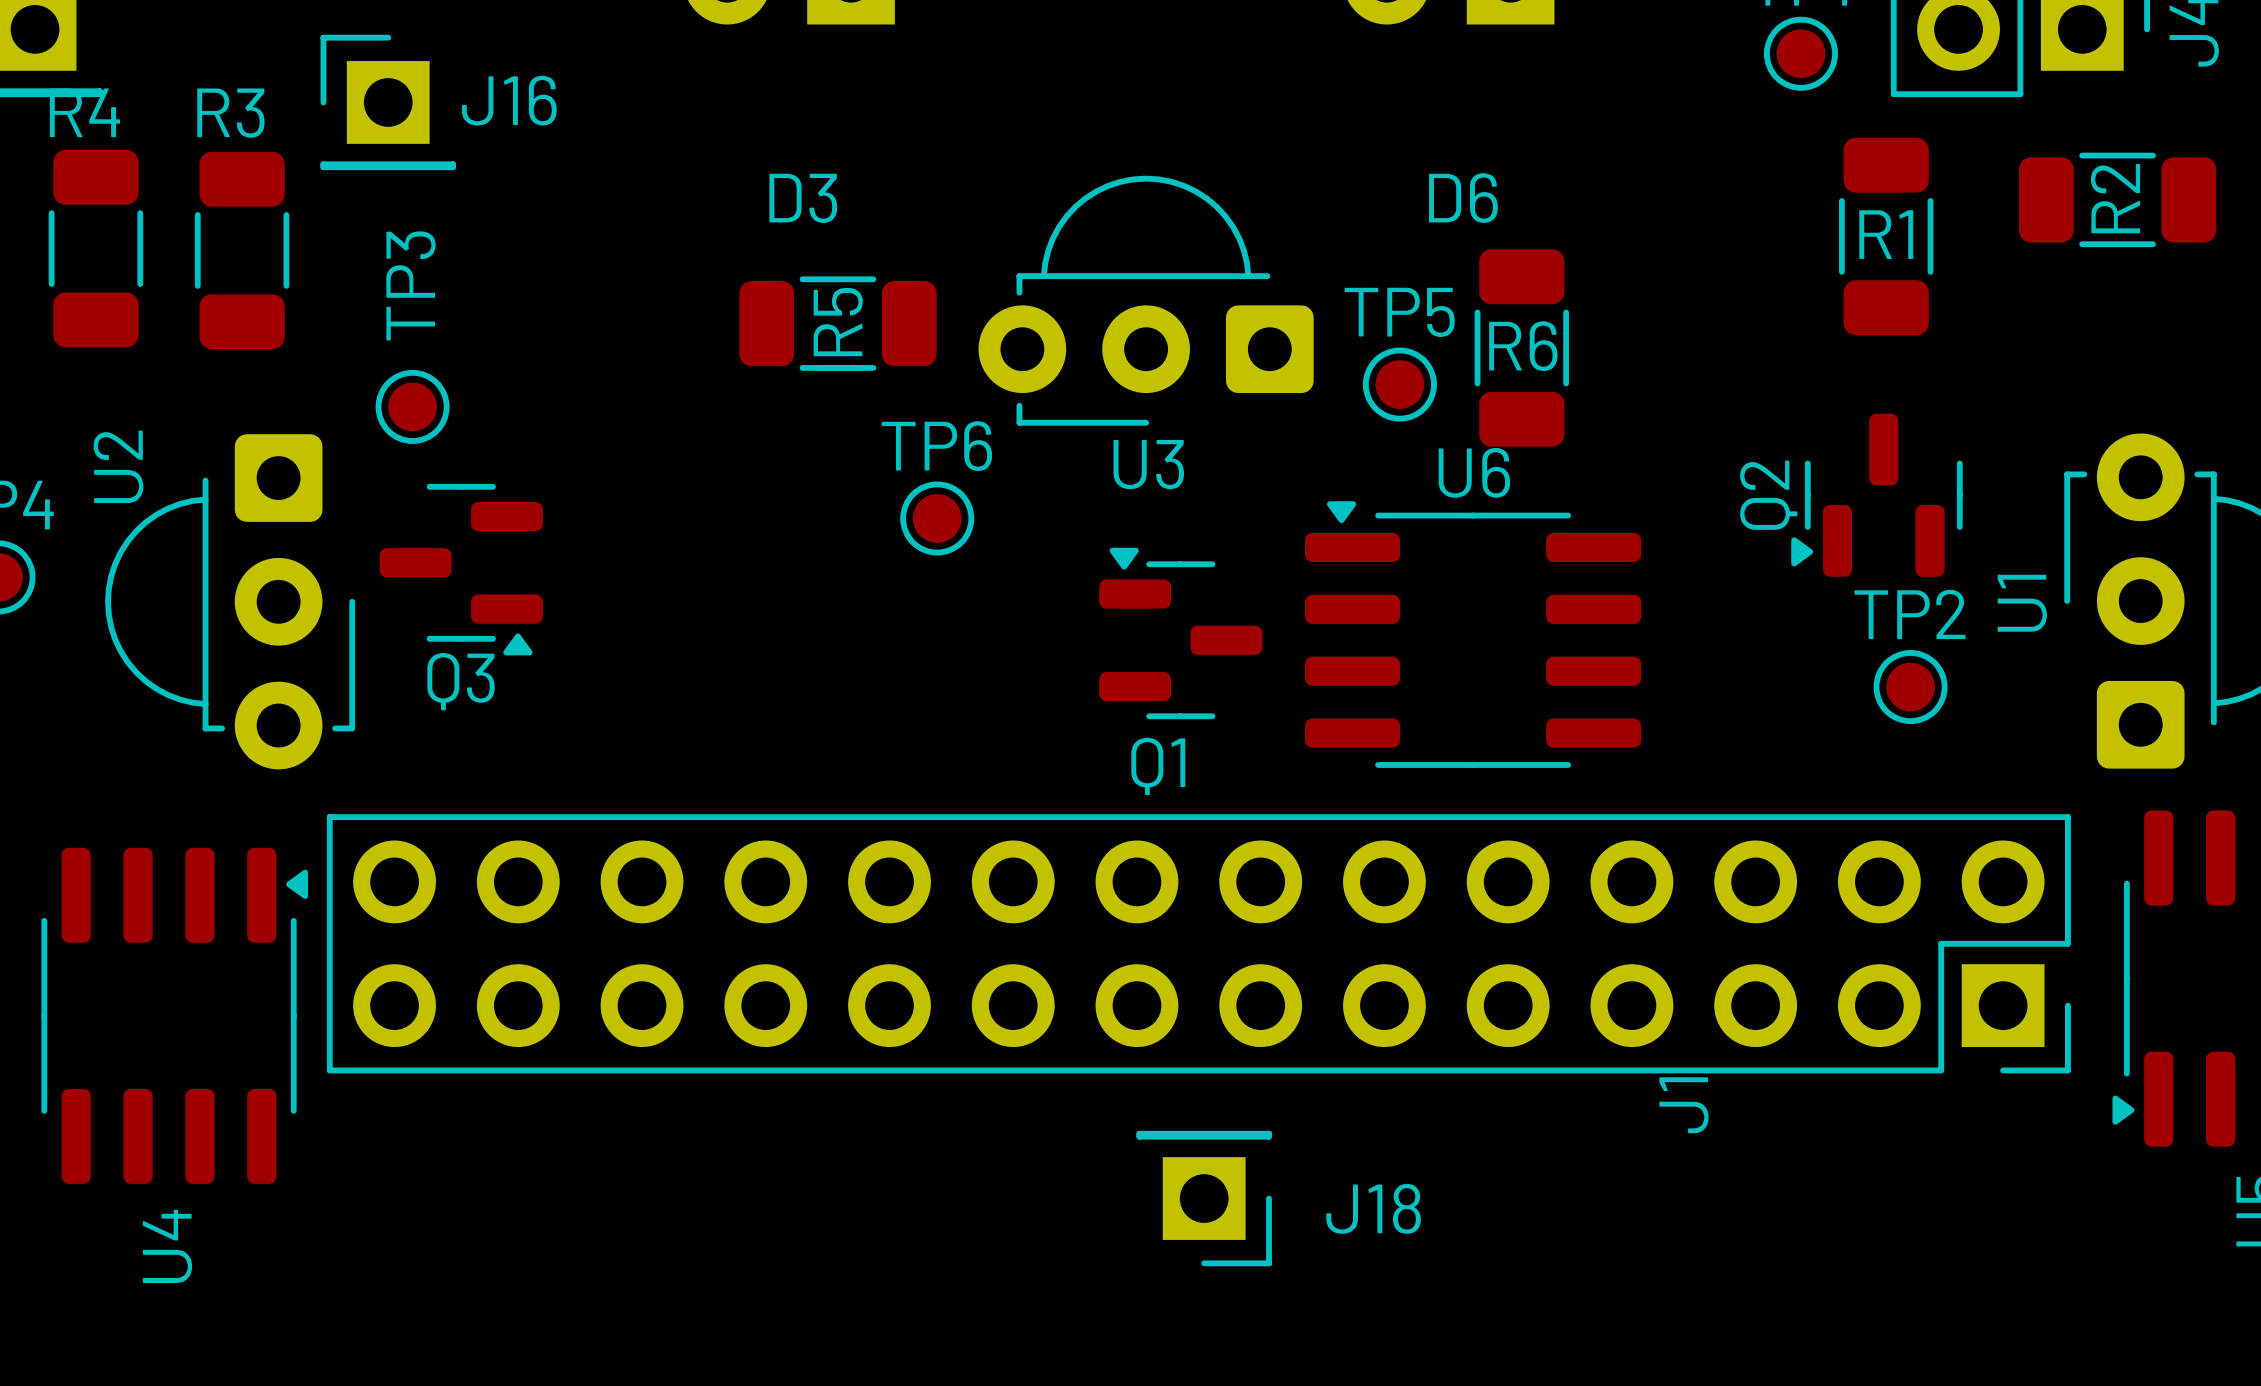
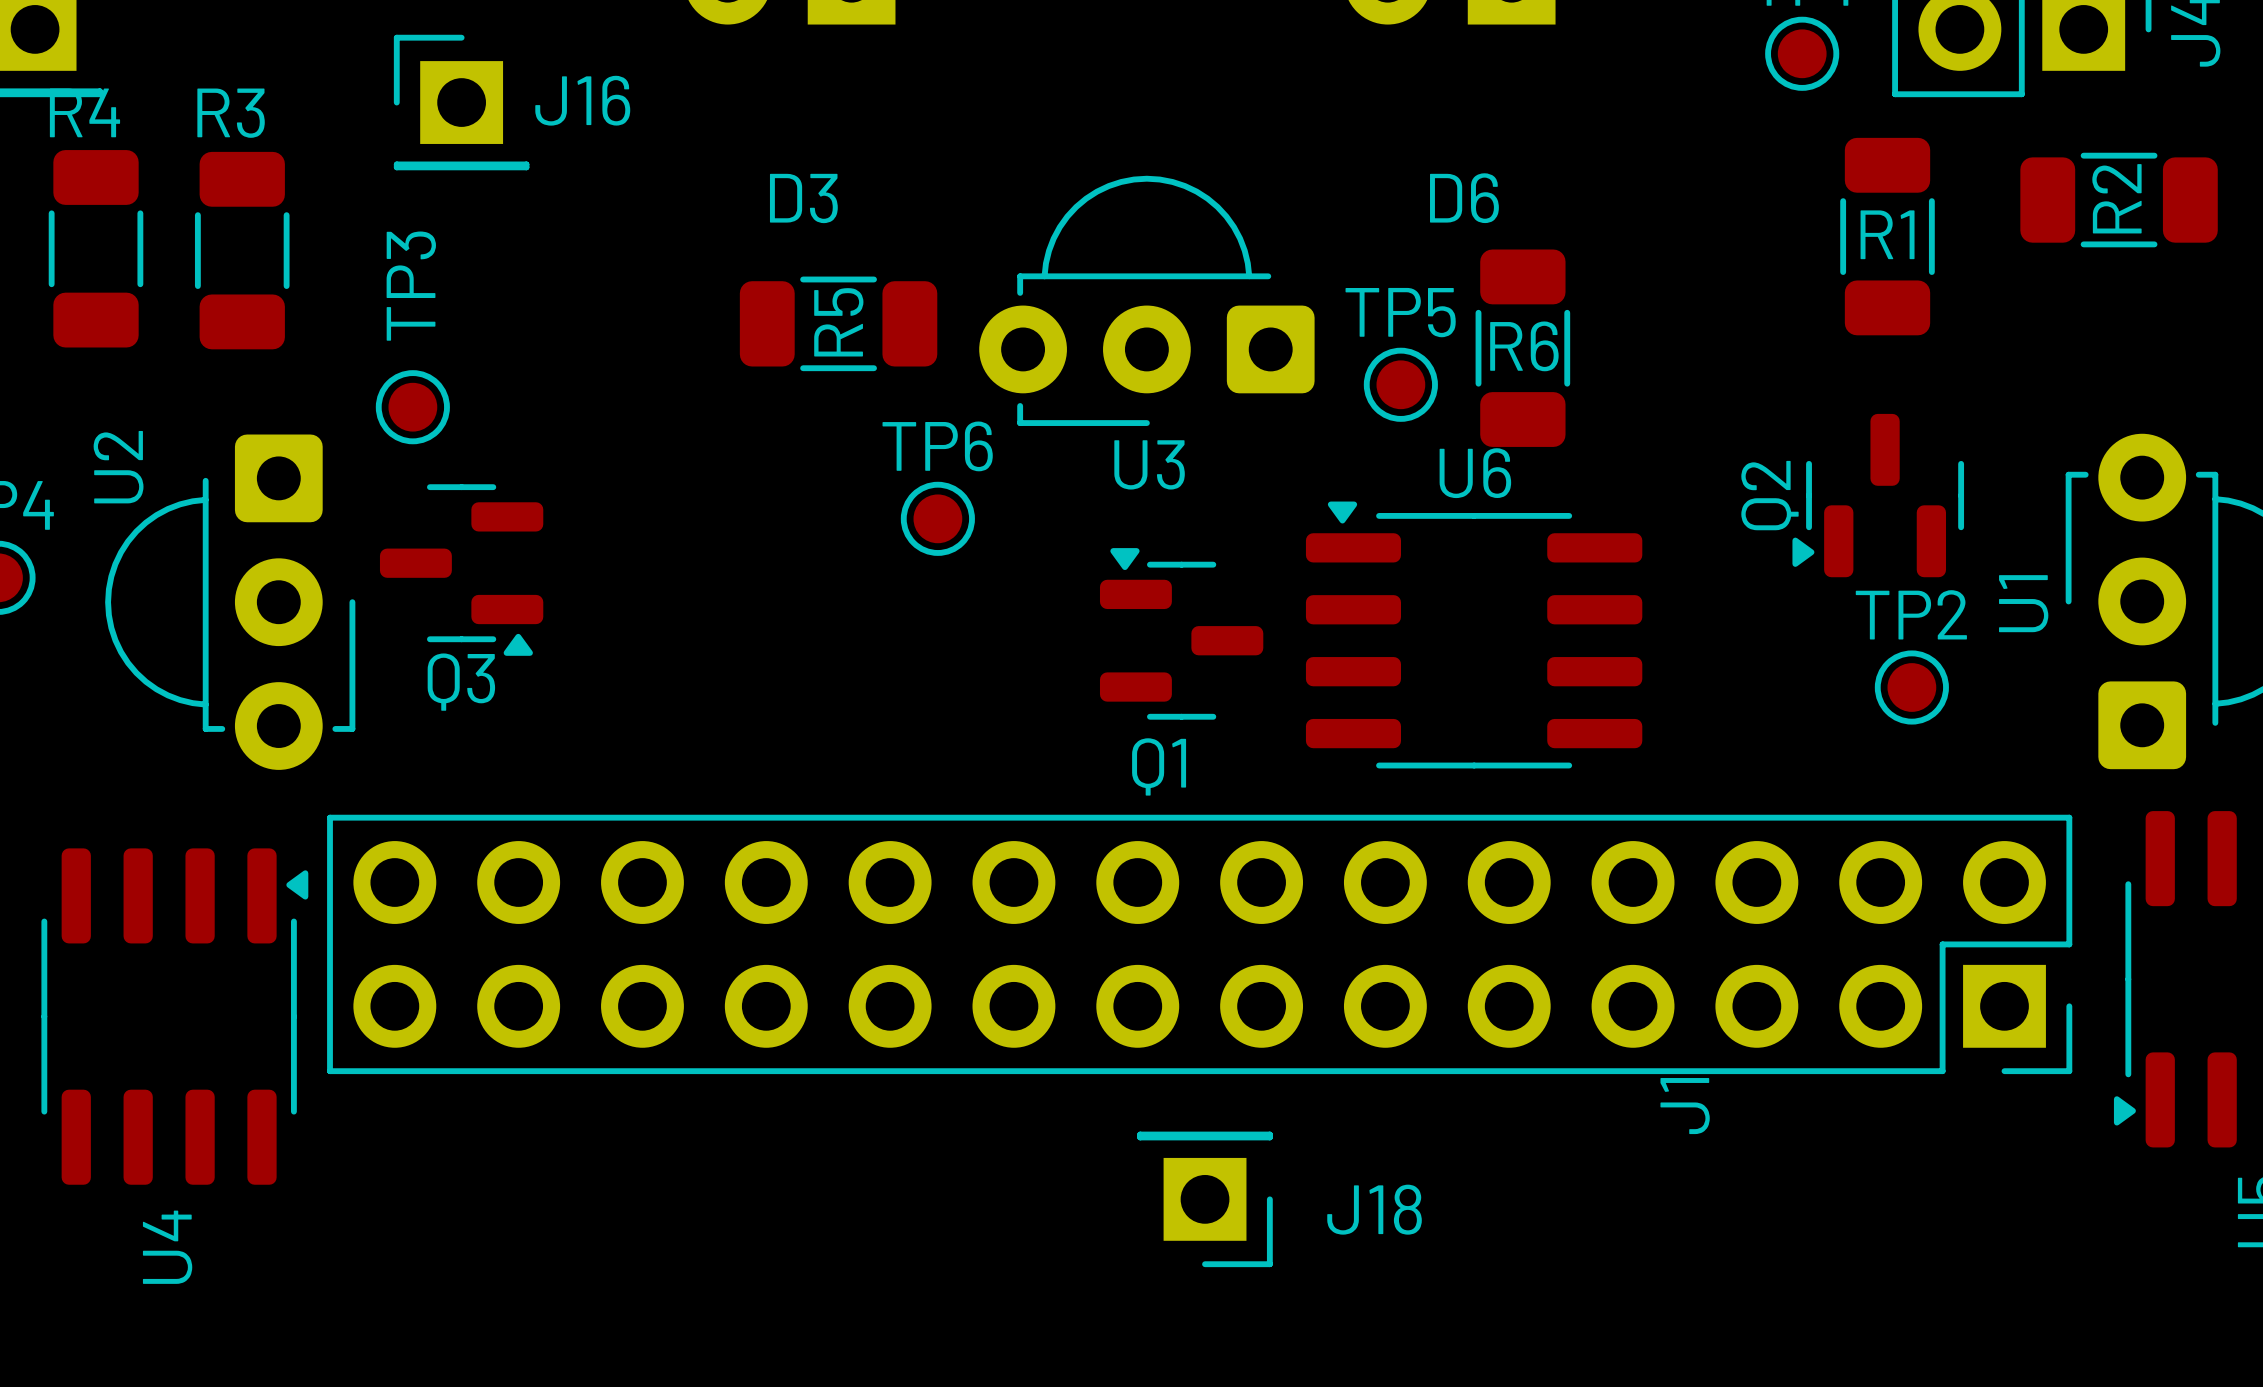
J16 position: (388, 102) -> (461, 102)

